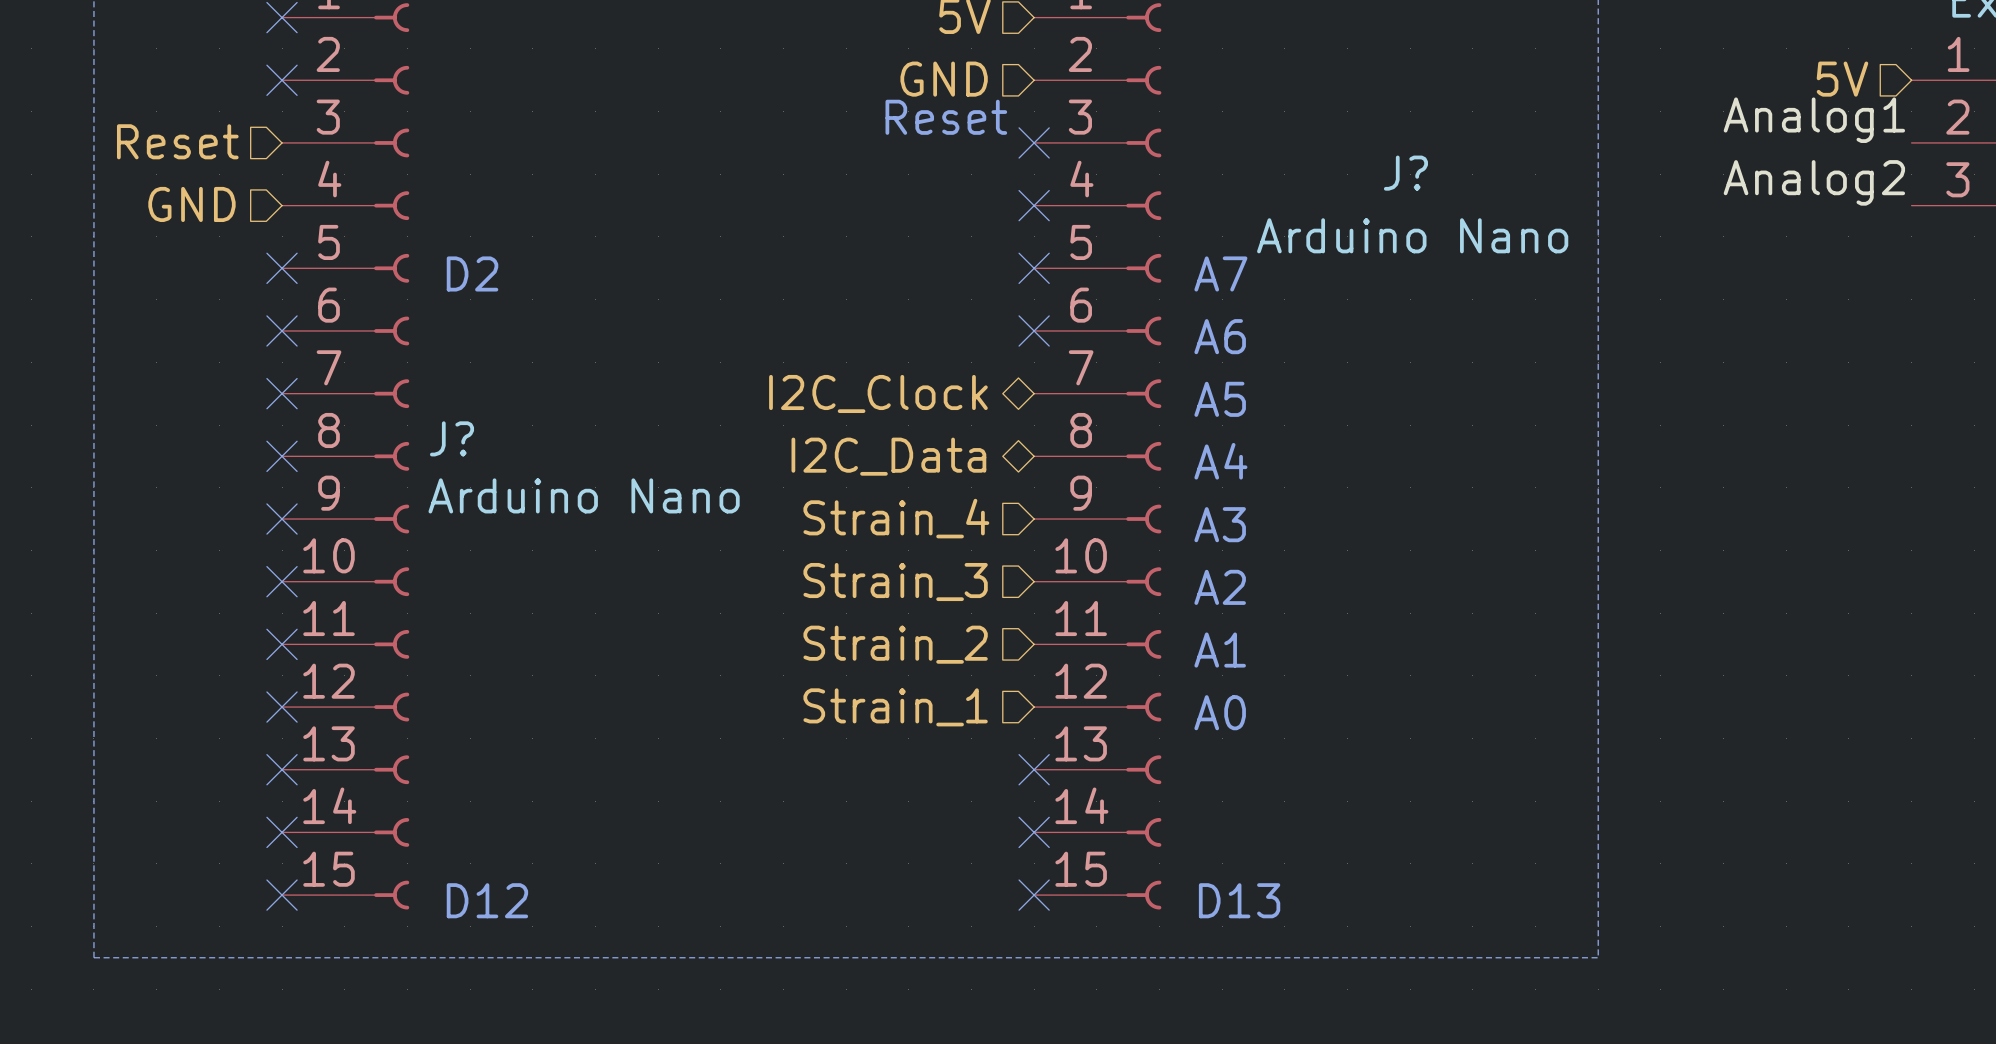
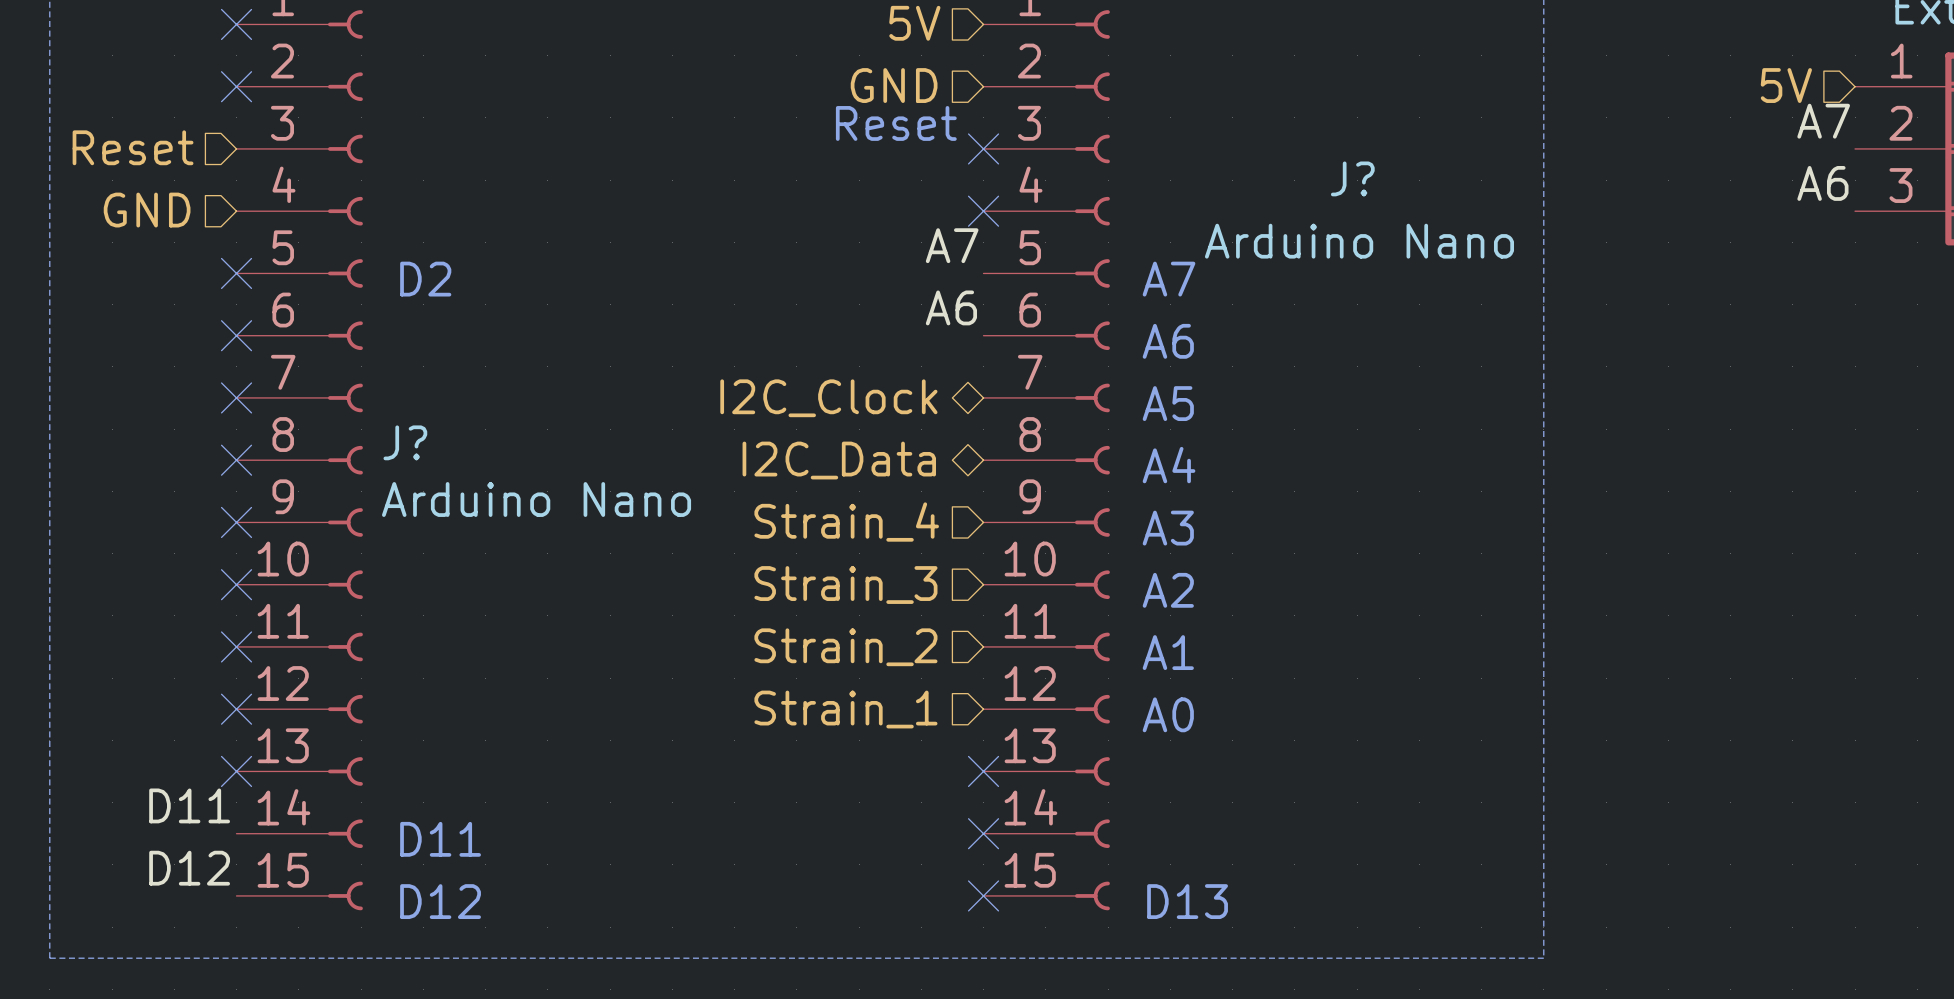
label: Analog1 (1814, 120) -> A7 (1823, 121)
label: Analog2 (1814, 182) -> A6 (1822, 183)
label: none -> A7 (952, 245)
no-connect mark: (1034, 268) -> none
label: none -> A6 (951, 307)
no-connect mark: (1034, 330) -> none
label: none -> D11 (189, 805)
no-connect mark: (282, 832) -> none
text: none -> D11 (440, 839)
label: none -> D12 (189, 868)
no-connect mark: (282, 895) -> none

